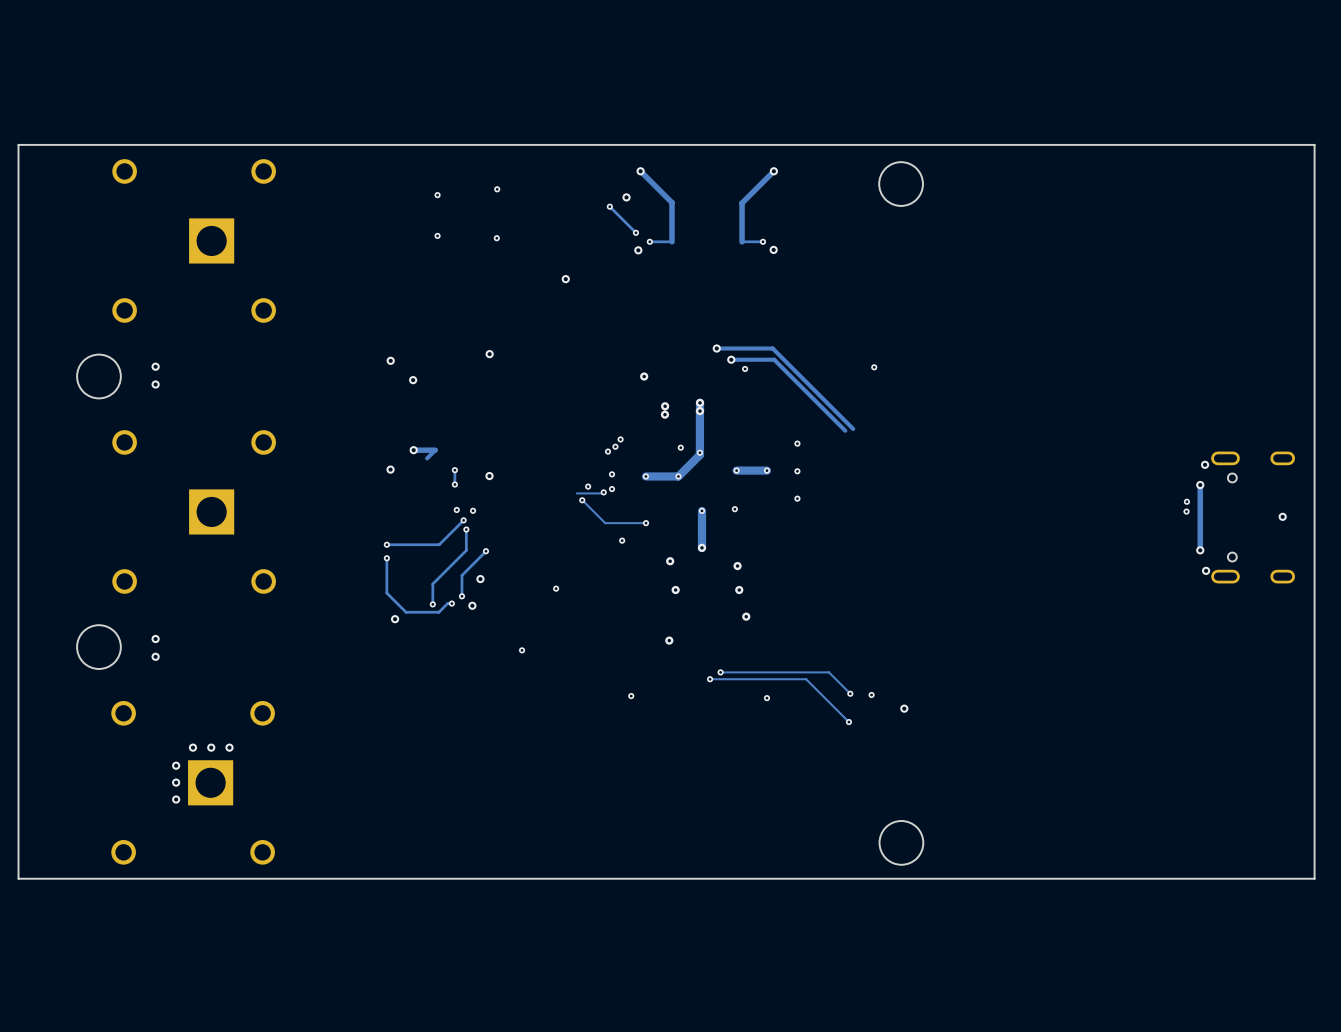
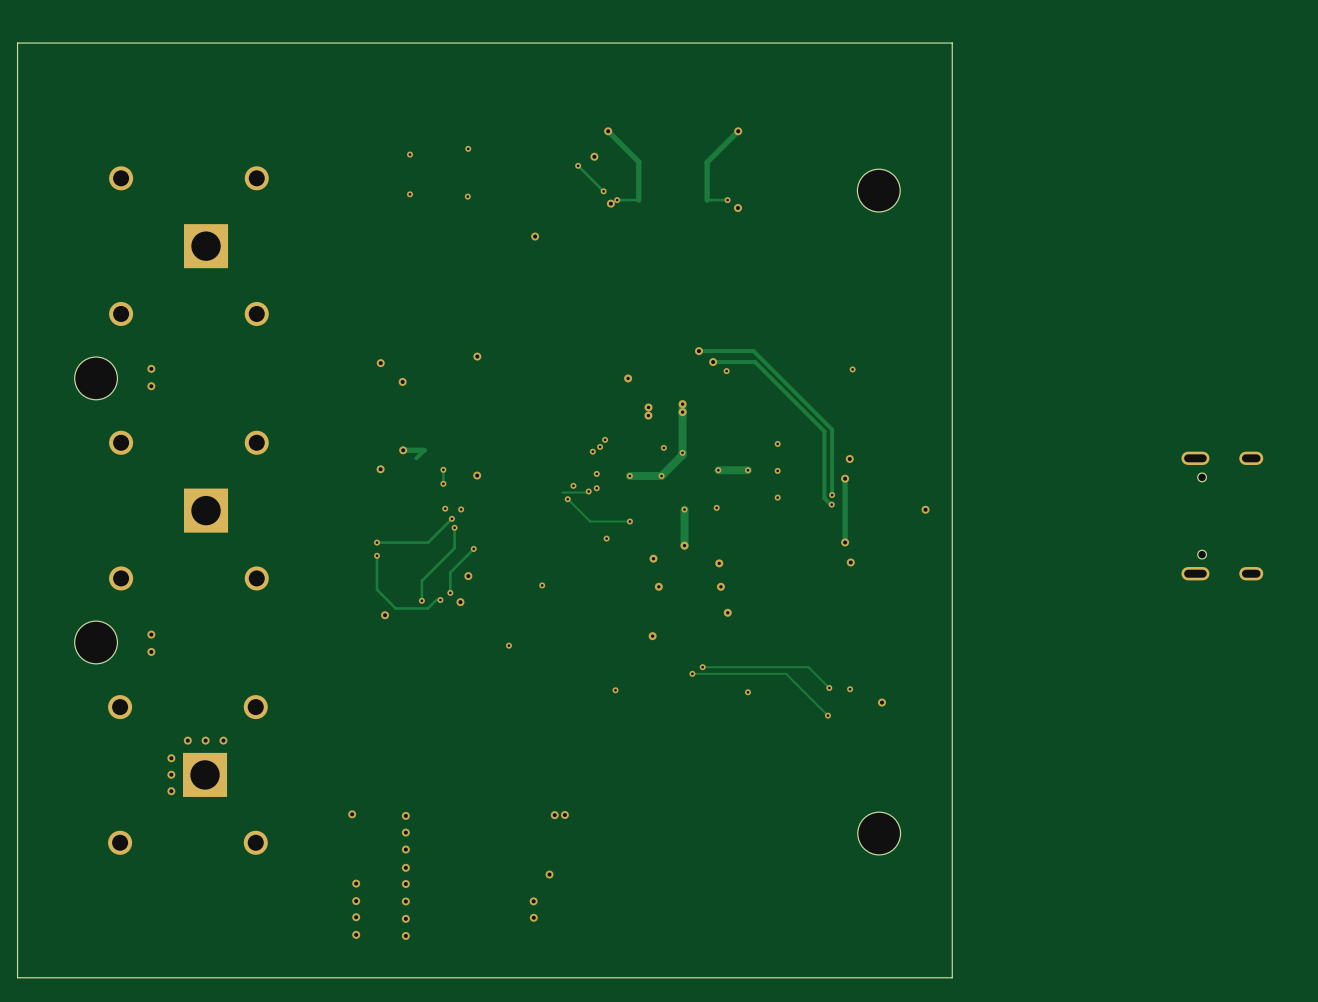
via: none -> (608, 131)
track: none -> (738, 131) (707, 162) (707, 200)
via: none -> (738, 131)
via: none -> (468, 148)
board edge: (18, 144) (1314, 144) (1314, 878) (18, 878) -> (17, 152) (17, 43) (952, 43) (952, 977) (17, 977) (17, 868)
via: none -> (410, 154)
via: none -> (594, 156)
via: none -> (578, 165)
track: (640, 171) (671, 202) (671, 241) (649, 241) -> (608, 131) (638, 161) (638, 200) (617, 200)
via: (640, 171) -> none
track: (773, 171) (742, 203) (742, 241) (762, 241) -> none
via: (773, 171) -> none
via: none -> (603, 191)
via position: (497, 189) -> (467, 196)
via: none -> (617, 200)
track: none -> (727, 200) (707, 200)
via position: (437, 195) -> (410, 194)
via: none -> (737, 208)
track: (609, 206) (635, 232) -> (578, 165) (603, 191)
via: (609, 206) -> none
via: none -> (535, 236)
via: (635, 232) -> none
via: (437, 235) -> none
via: (496, 238) -> none
via: (649, 241) -> none
via position: (762, 241) -> (727, 200)
via: (773, 249) -> none
via: (638, 250) -> none
via: (565, 279) -> none
track: none -> (832, 429) (832, 495)
track: none -> (824, 431) (824, 498) (831, 504)
via: none -> (849, 458)
via: (1205, 464) -> none
via: none -> (845, 478)
track: (1200, 485) (1200, 550) -> (845, 478) (845, 542)
via: (1200, 485) -> none
via: none -> (832, 495)
via: (1186, 501) -> none
via: none -> (831, 504)
via: none -> (925, 509)
via: (1186, 511) -> none
via: (1282, 516) -> none
via: none -> (845, 542)
via: (1200, 550) -> none
via: none -> (850, 562)
via: (1206, 570) -> none
via: none -> (352, 814)
via: none -> (564, 814)
via: none -> (405, 815)
via: none -> (554, 815)
via: none -> (405, 832)
via: none -> (405, 849)
via: none -> (405, 867)
via: none -> (549, 874)
via: none -> (356, 883)
via: none -> (405, 883)
via: none -> (356, 901)
via: none -> (405, 901)
via: none -> (533, 901)
via: none -> (356, 917)
via: none -> (533, 917)
via: none -> (405, 918)
via: none -> (356, 934)
via: none -> (405, 935)

